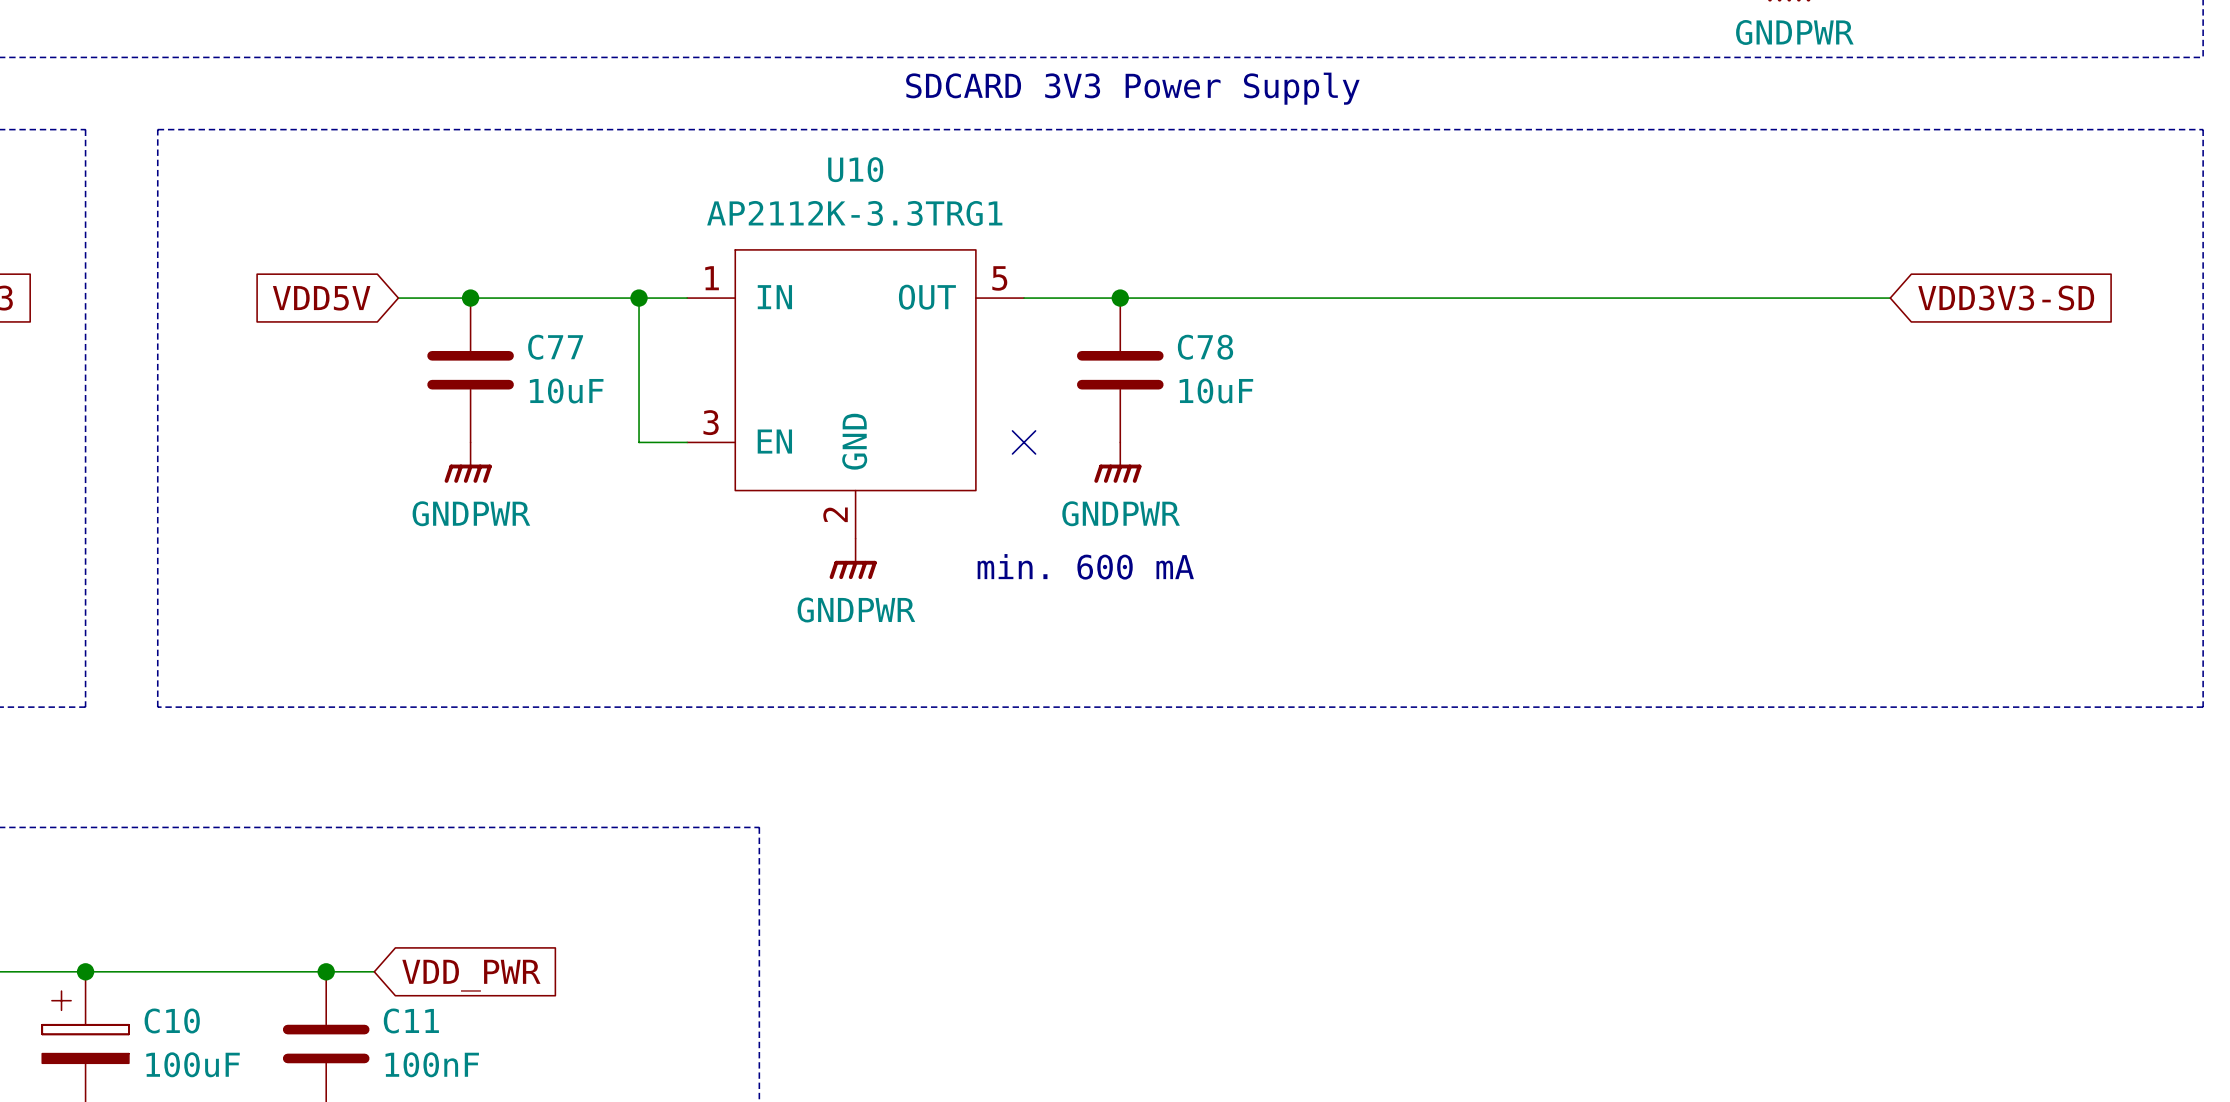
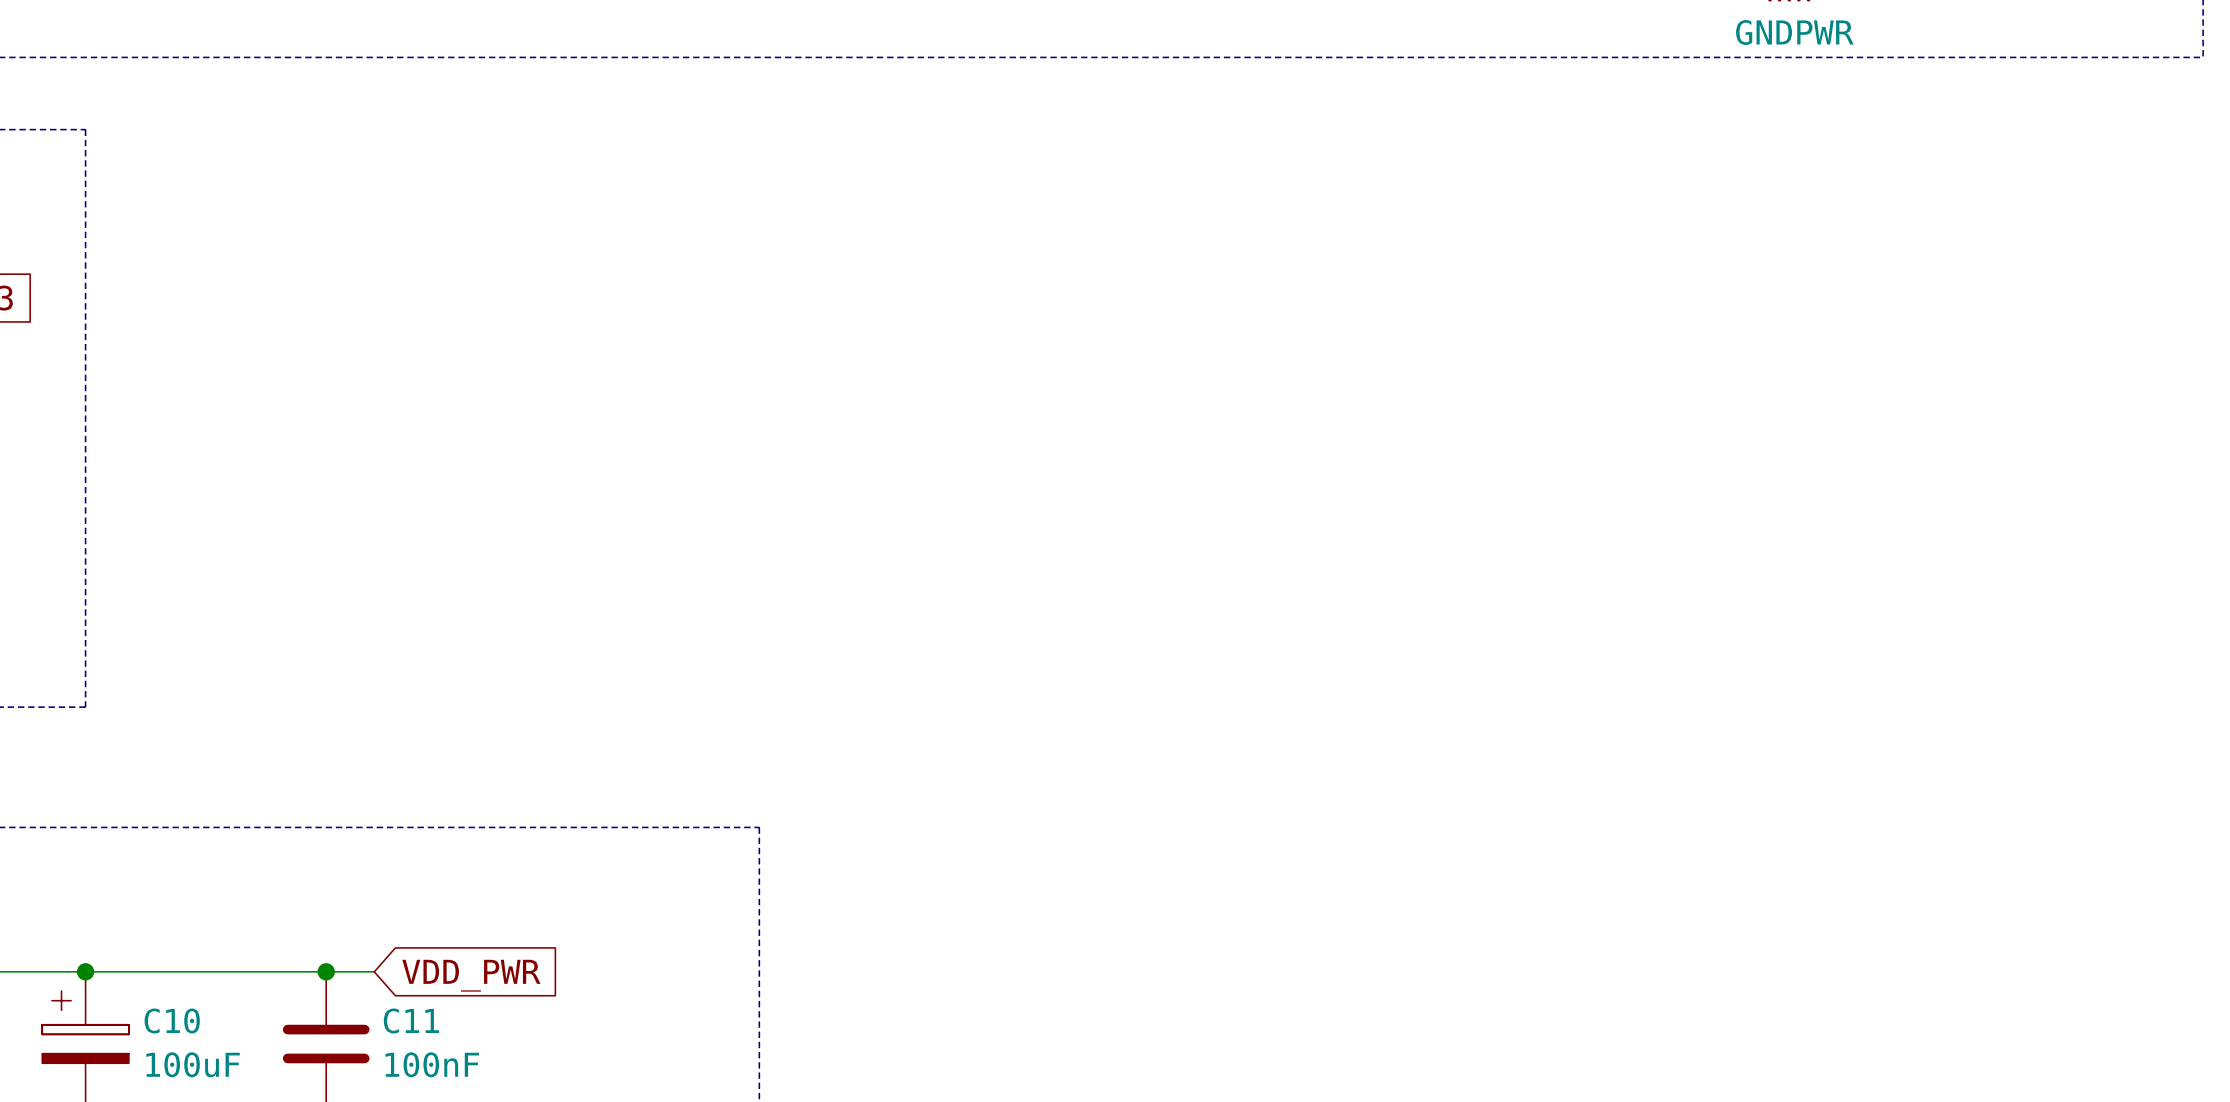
text: SDCARD 3V3 Power Supply (1132, 88) -> none
line: (157, 129) (157, 707) (2203, 707) (2203, 129) (157, 129) -> none
global label: VDD5V (321, 298) -> none
wire: (398, 298) (687, 298) -> none
junction: (470, 298) -> none
wire: (639, 298) (639, 442) (687, 442) -> none
junction: (639, 298) -> none
wire: (1024, 298) (1890, 298) -> none
junction: (1120, 298) -> none
global label: VDD3V3-SD (2006, 298) -> none
C77: 10uF (470, 370) -> none
C78: 10uF (1120, 370) -> none
U10: AP2112K-3.3TRG1 (855, 394) -> none
no-connect mark: (1024, 442) -> none
power symbol: GNDPWR (468, 462) -> none
power symbol: GNDPWR (1117, 462) -> none
power symbol: GNDPWR (853, 558) -> none
text: min. 600 mA (1085, 566) -> none

